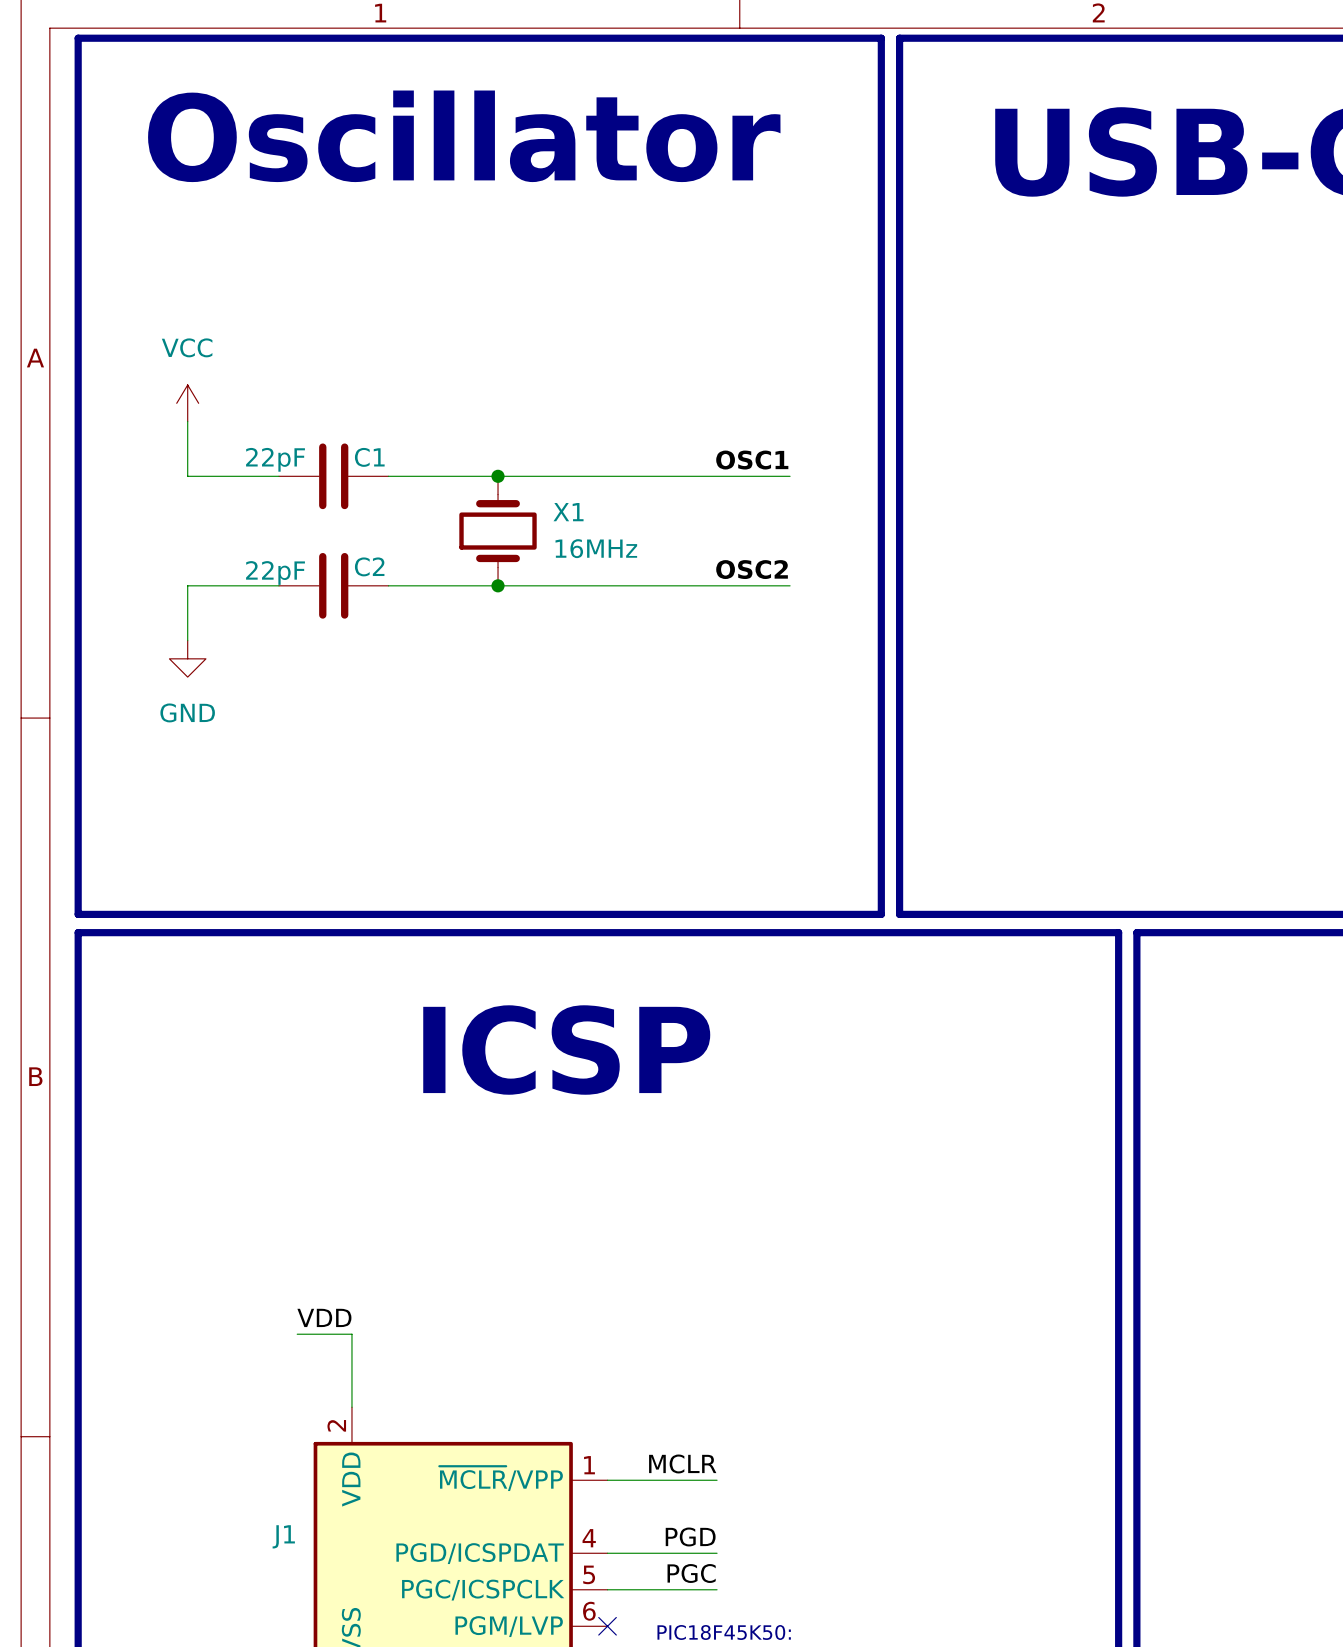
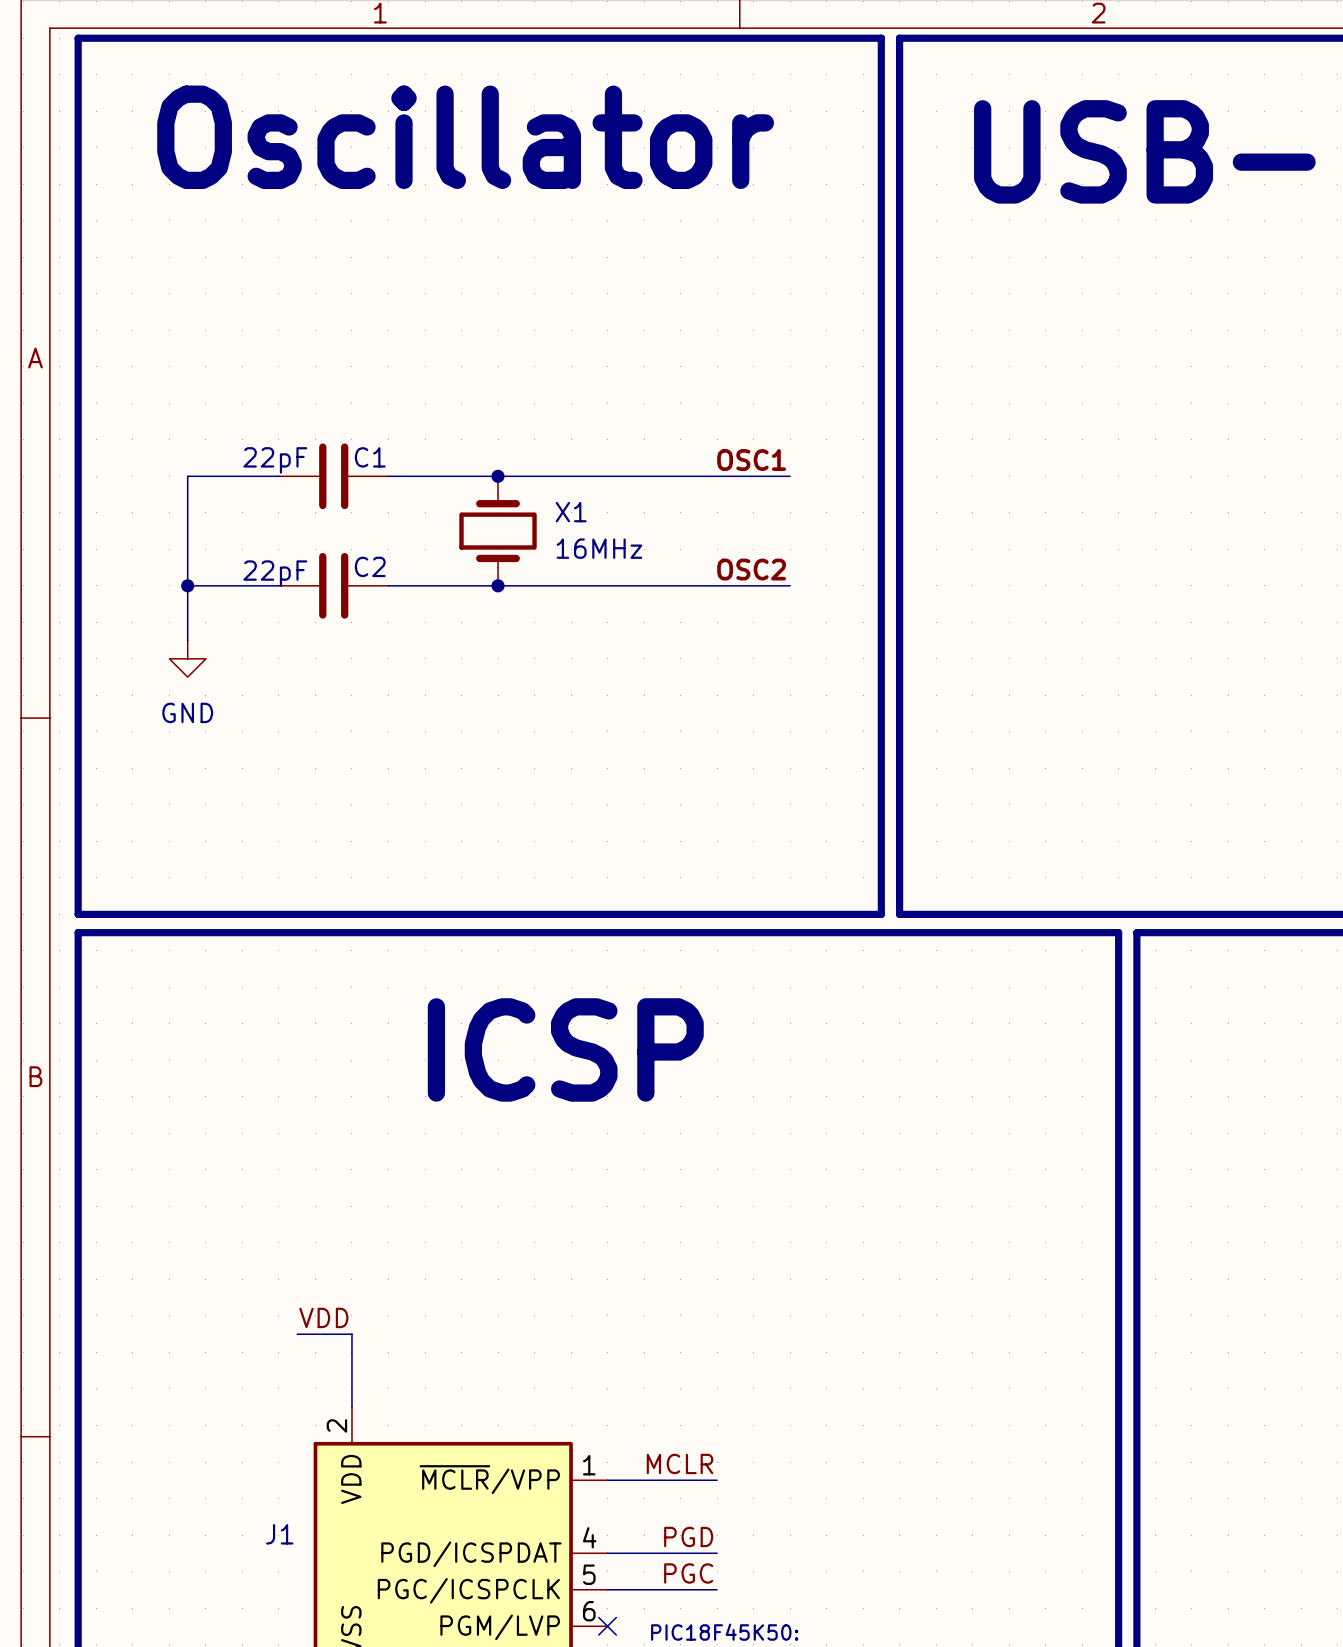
power symbol: VCC (187, 403) -> none
wire: (187, 421) (187, 476) -> (187, 585) (187, 476)
junction: none -> (187, 585)

